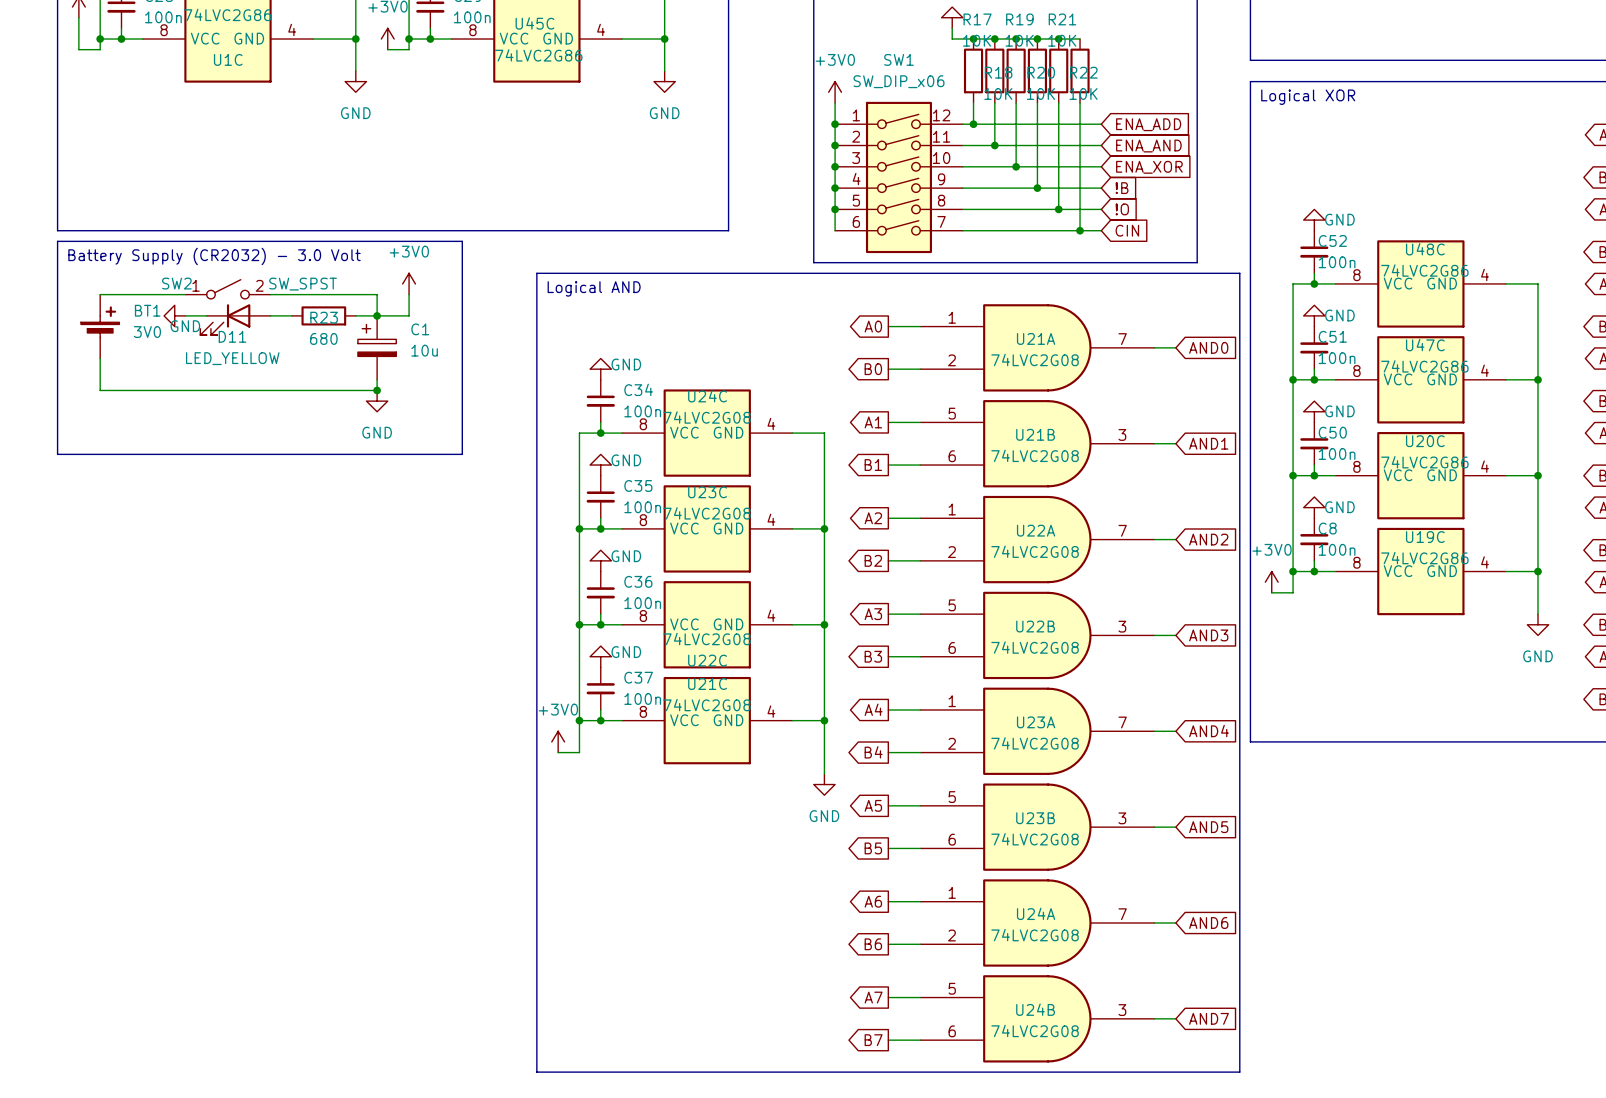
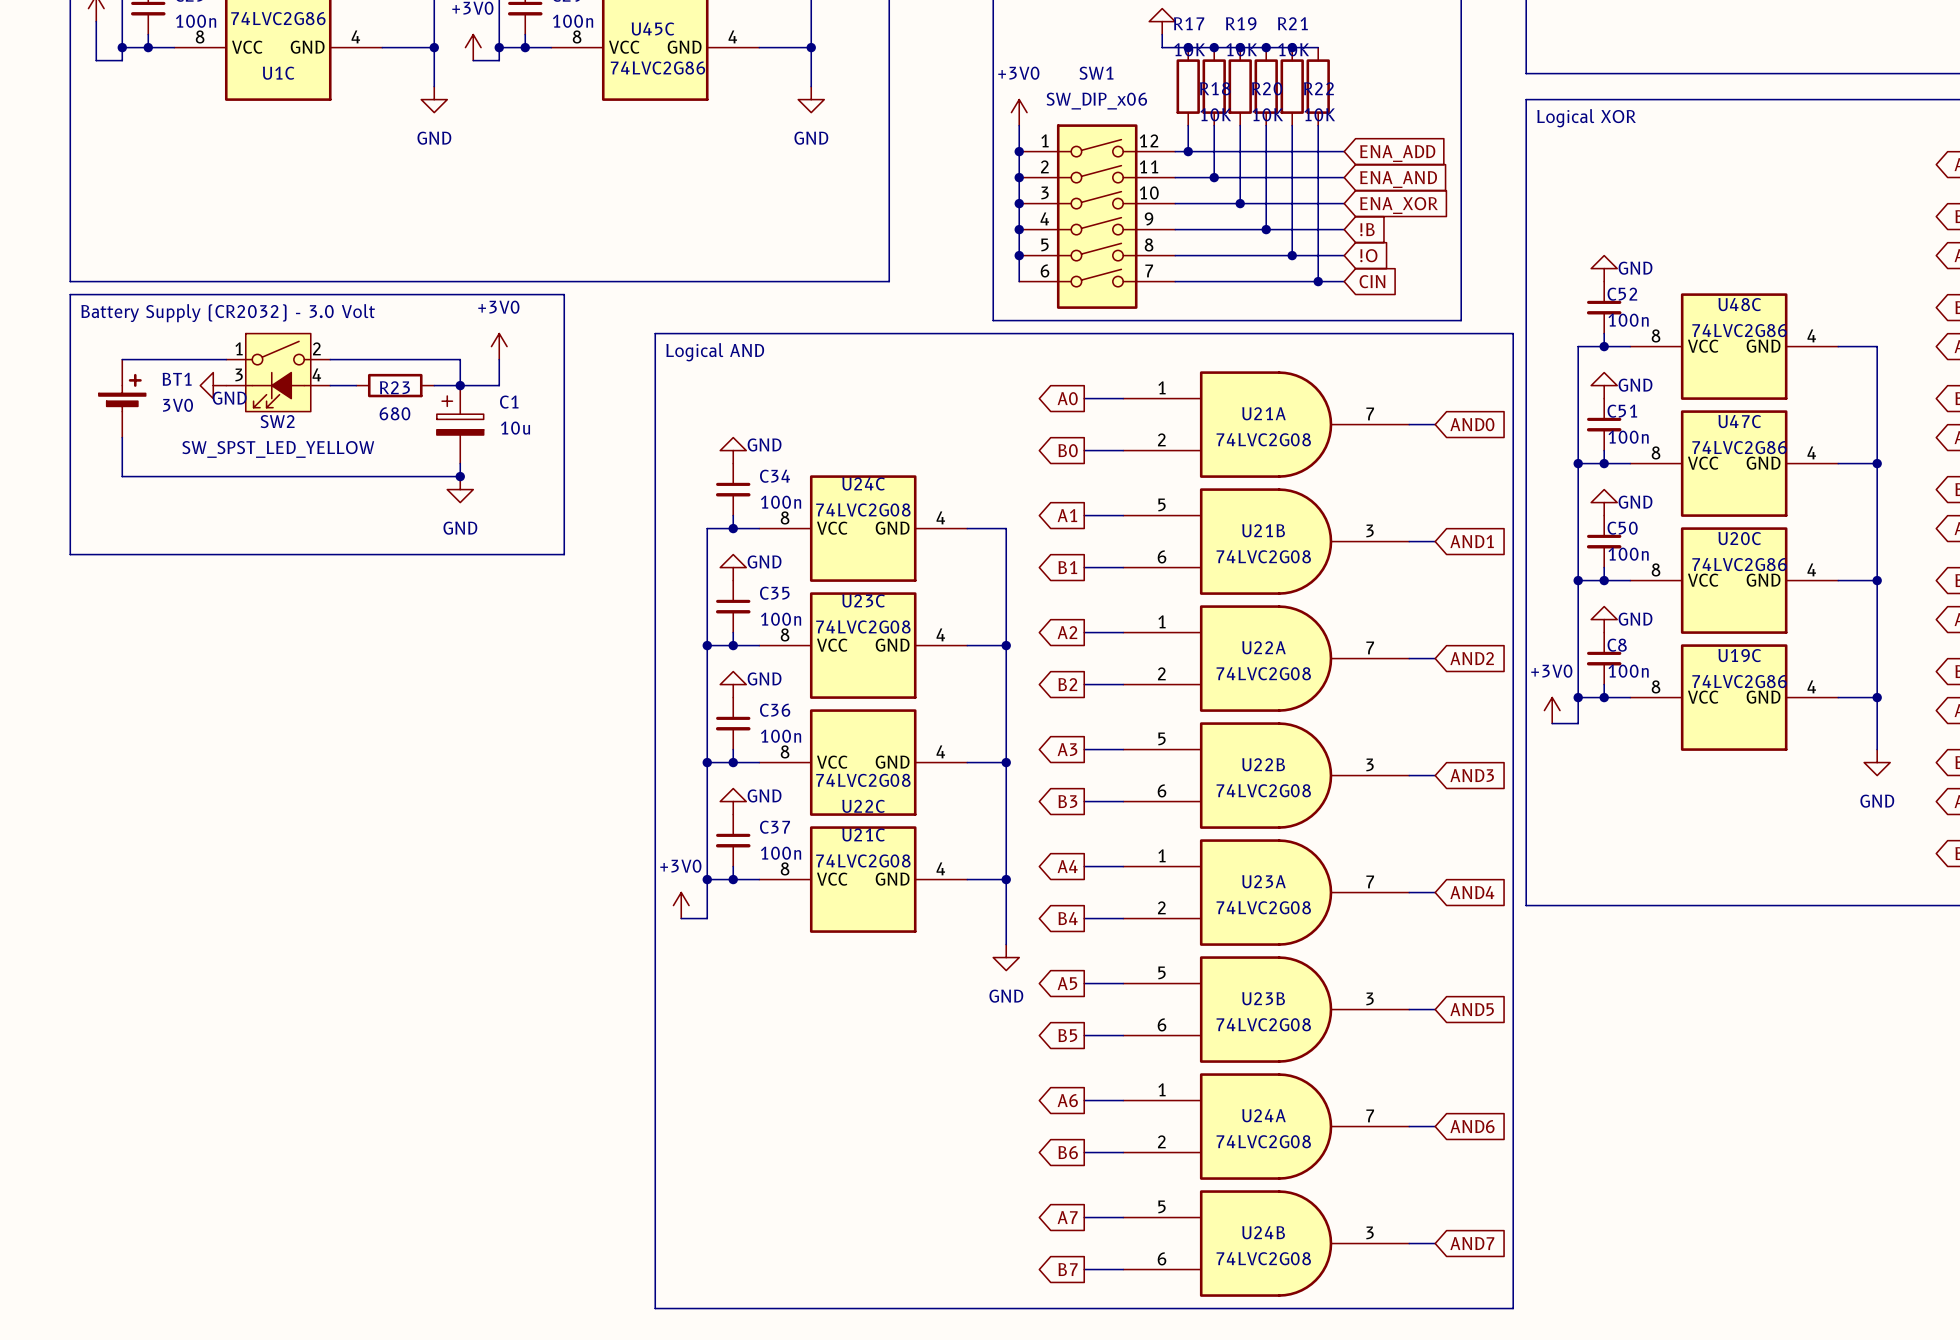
SW2 symbol: [185, 279, 271, 299] -> [226, 333, 331, 412]
SW2 name position: SW2 (176, 283) -> SW2 (277, 421)
SW2 value: SW_SPST (303, 284) -> SW_SPST_LED_YELLOW (278, 449)
D11: LED_YELLOW (235, 319) -> none

